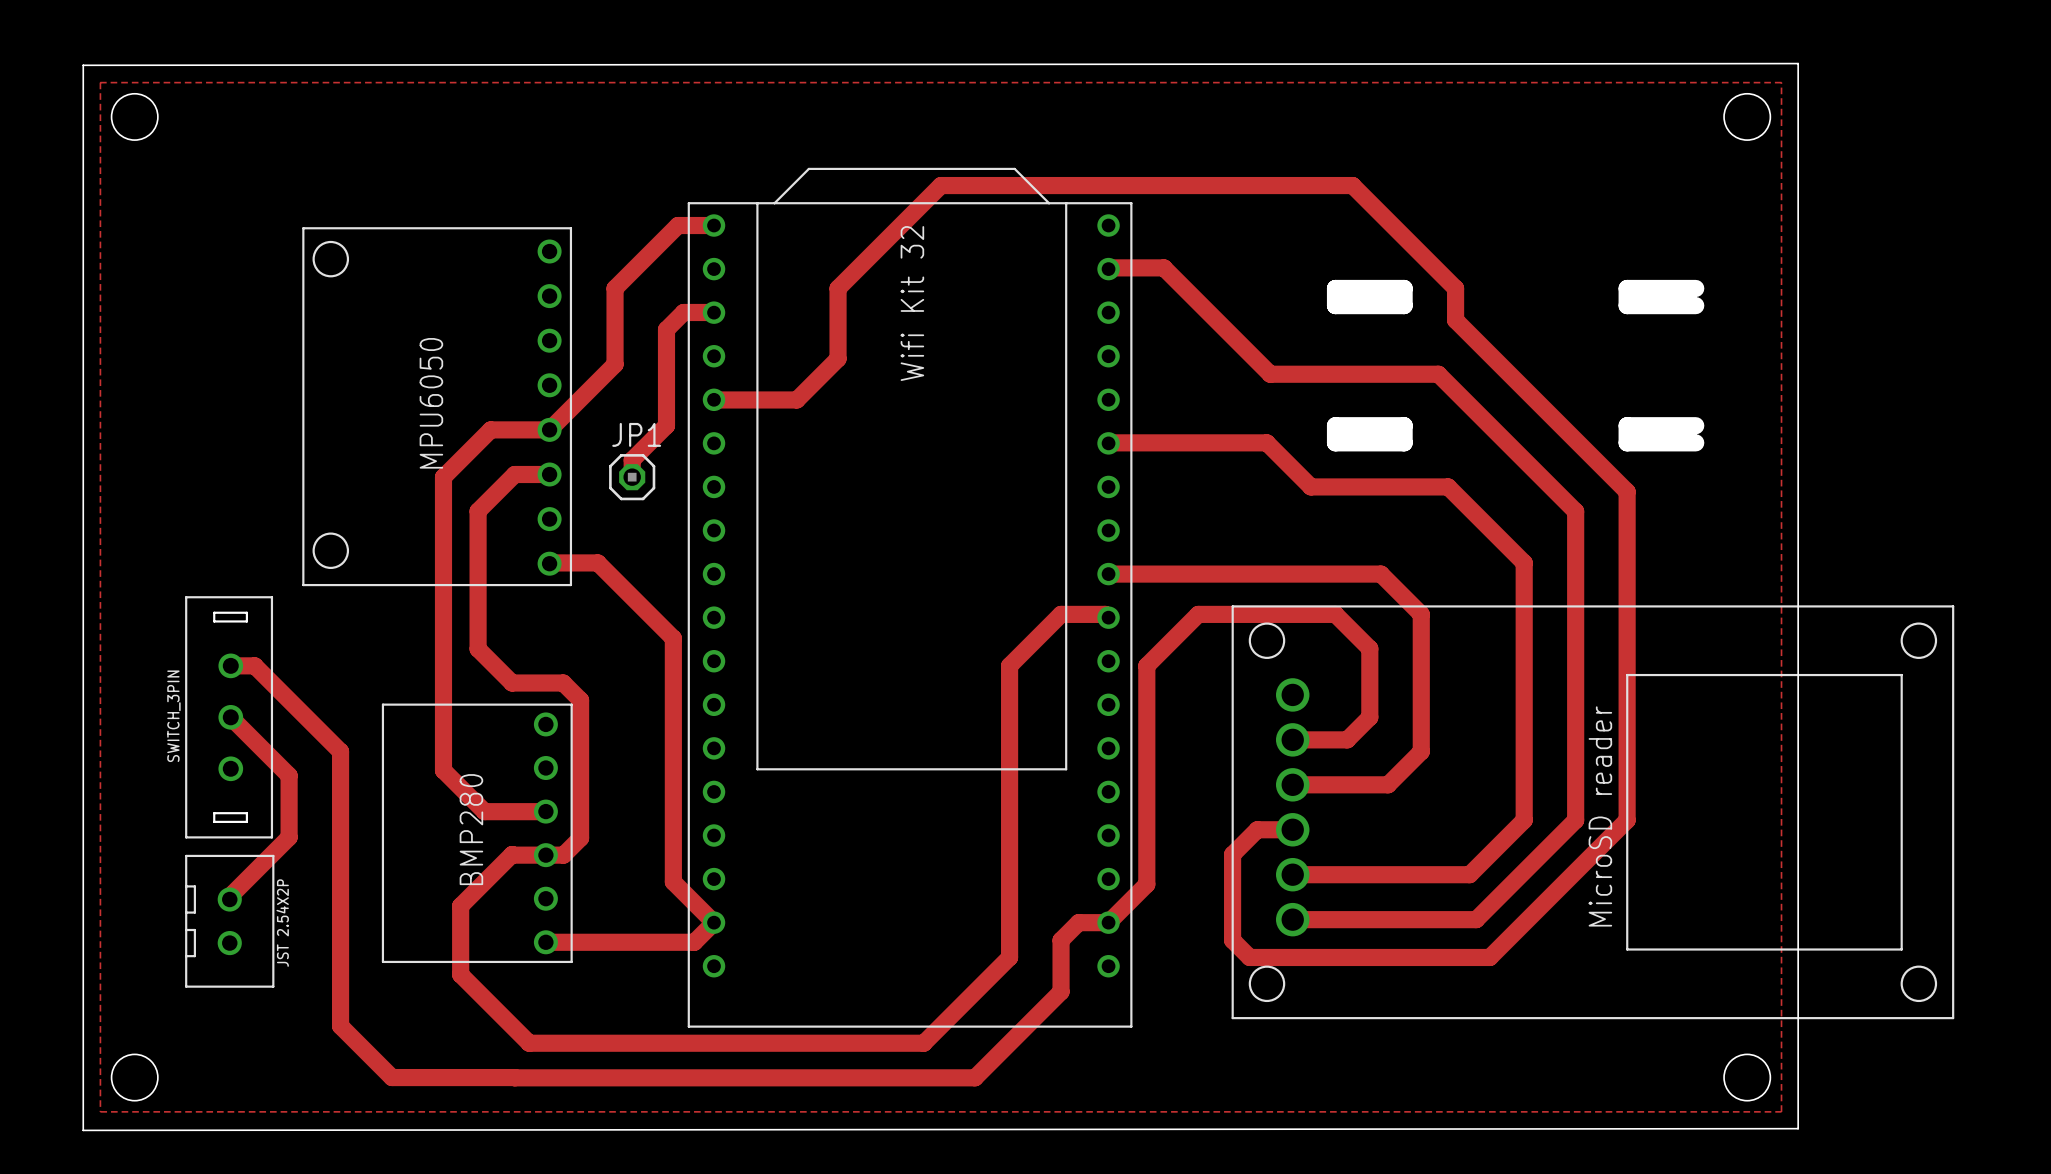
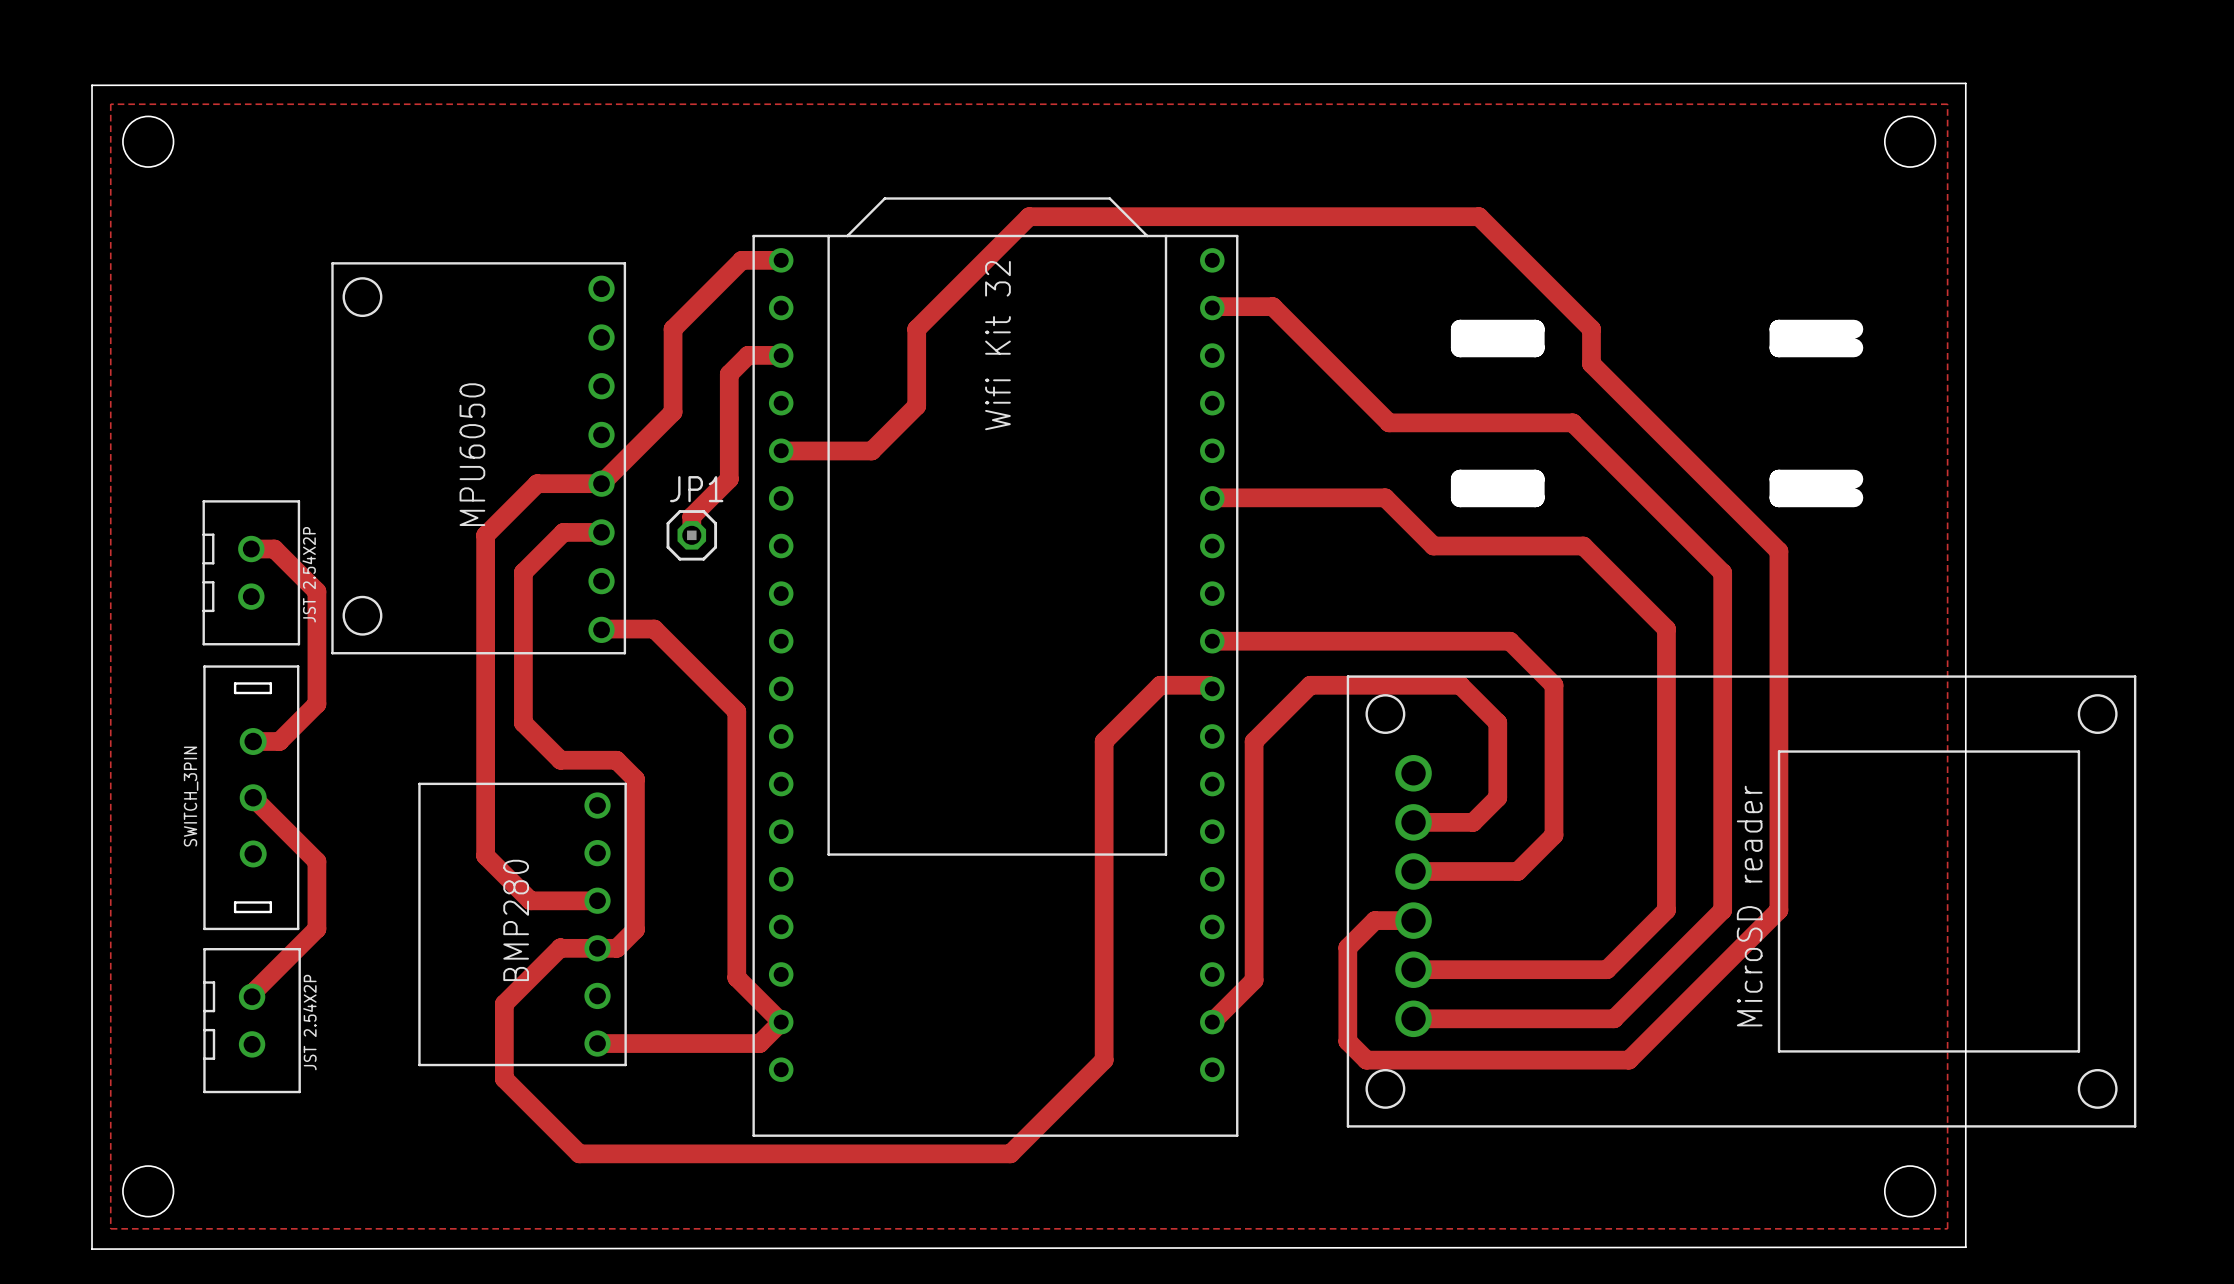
part: none -> (251, 572)
top track: (254, 665) (340, 751) (340, 1026) (392, 1077) (975, 1077) (1061, 991) (1061, 940) (1078, 922) (1108, 922) -> (279, 741) (316, 704) (316, 591) (274, 549) (251, 549)

